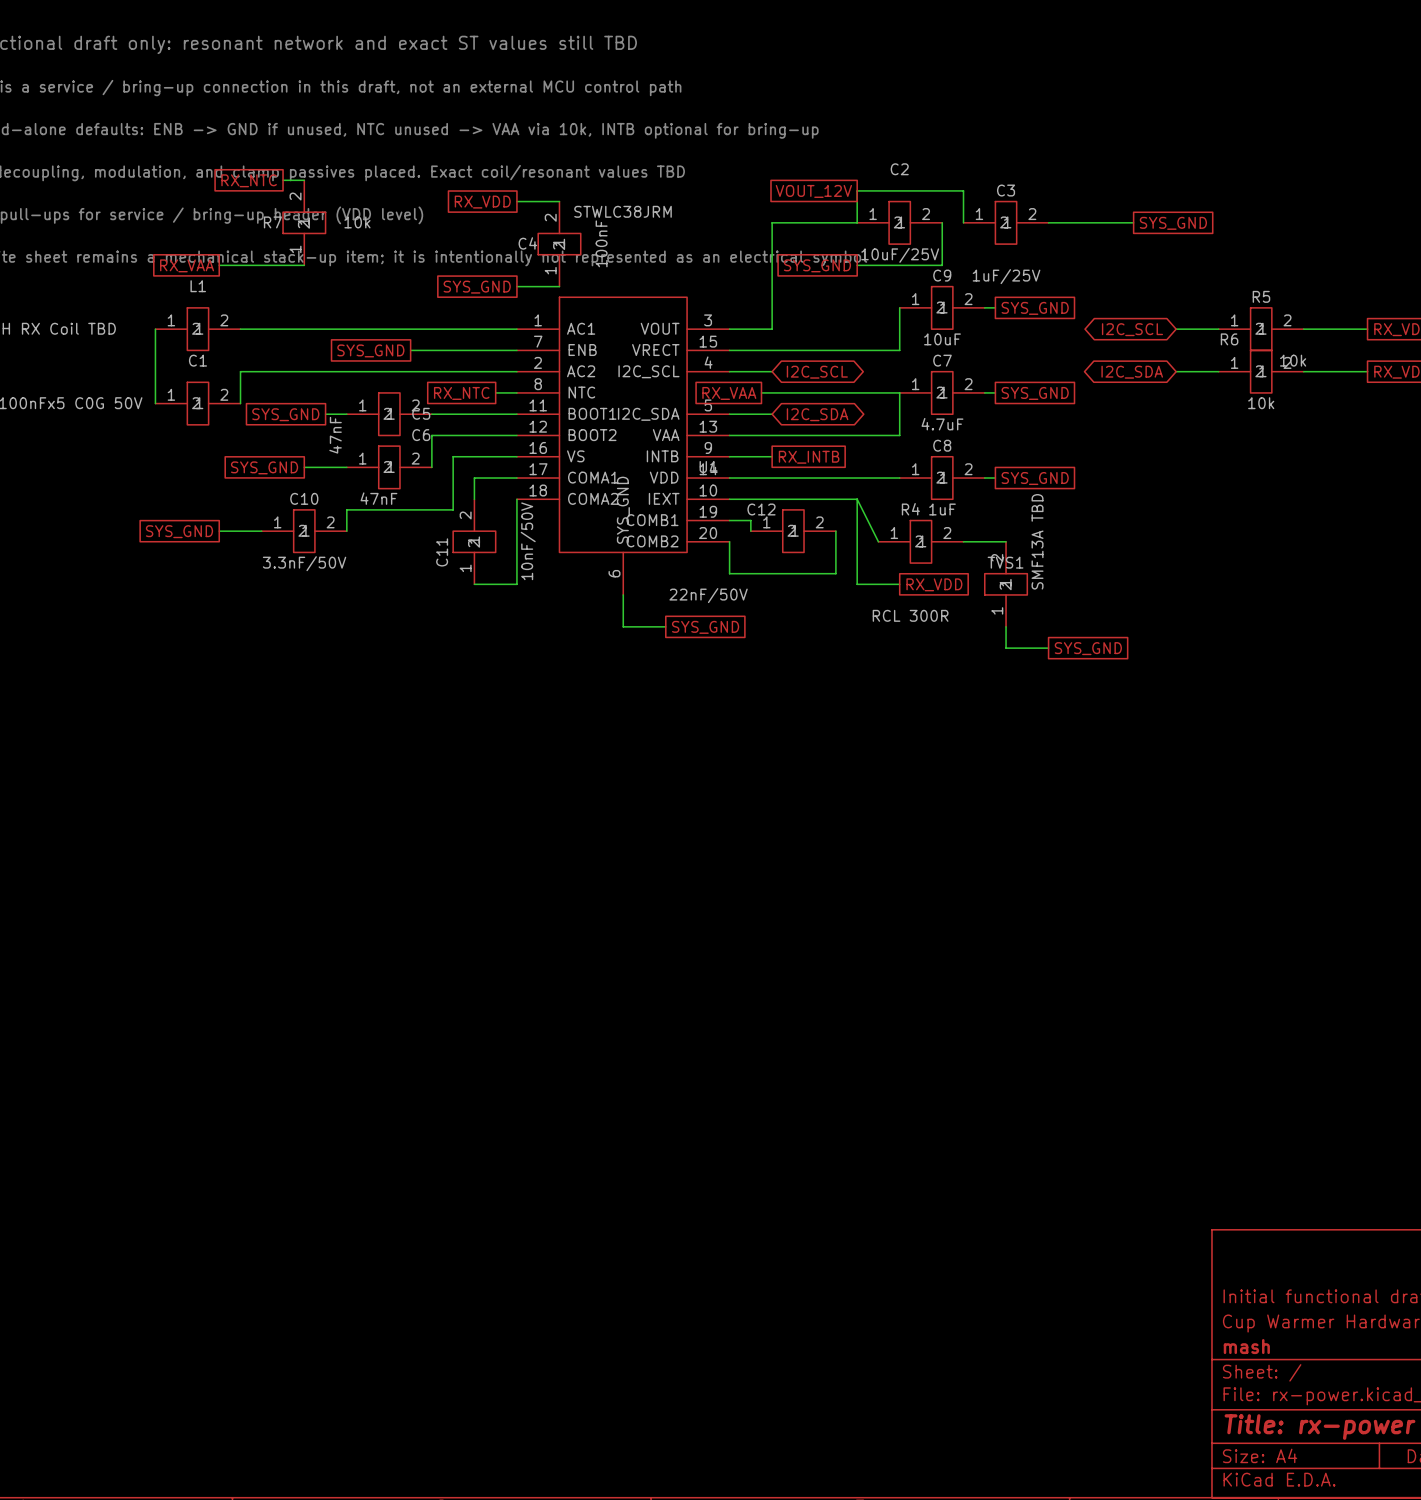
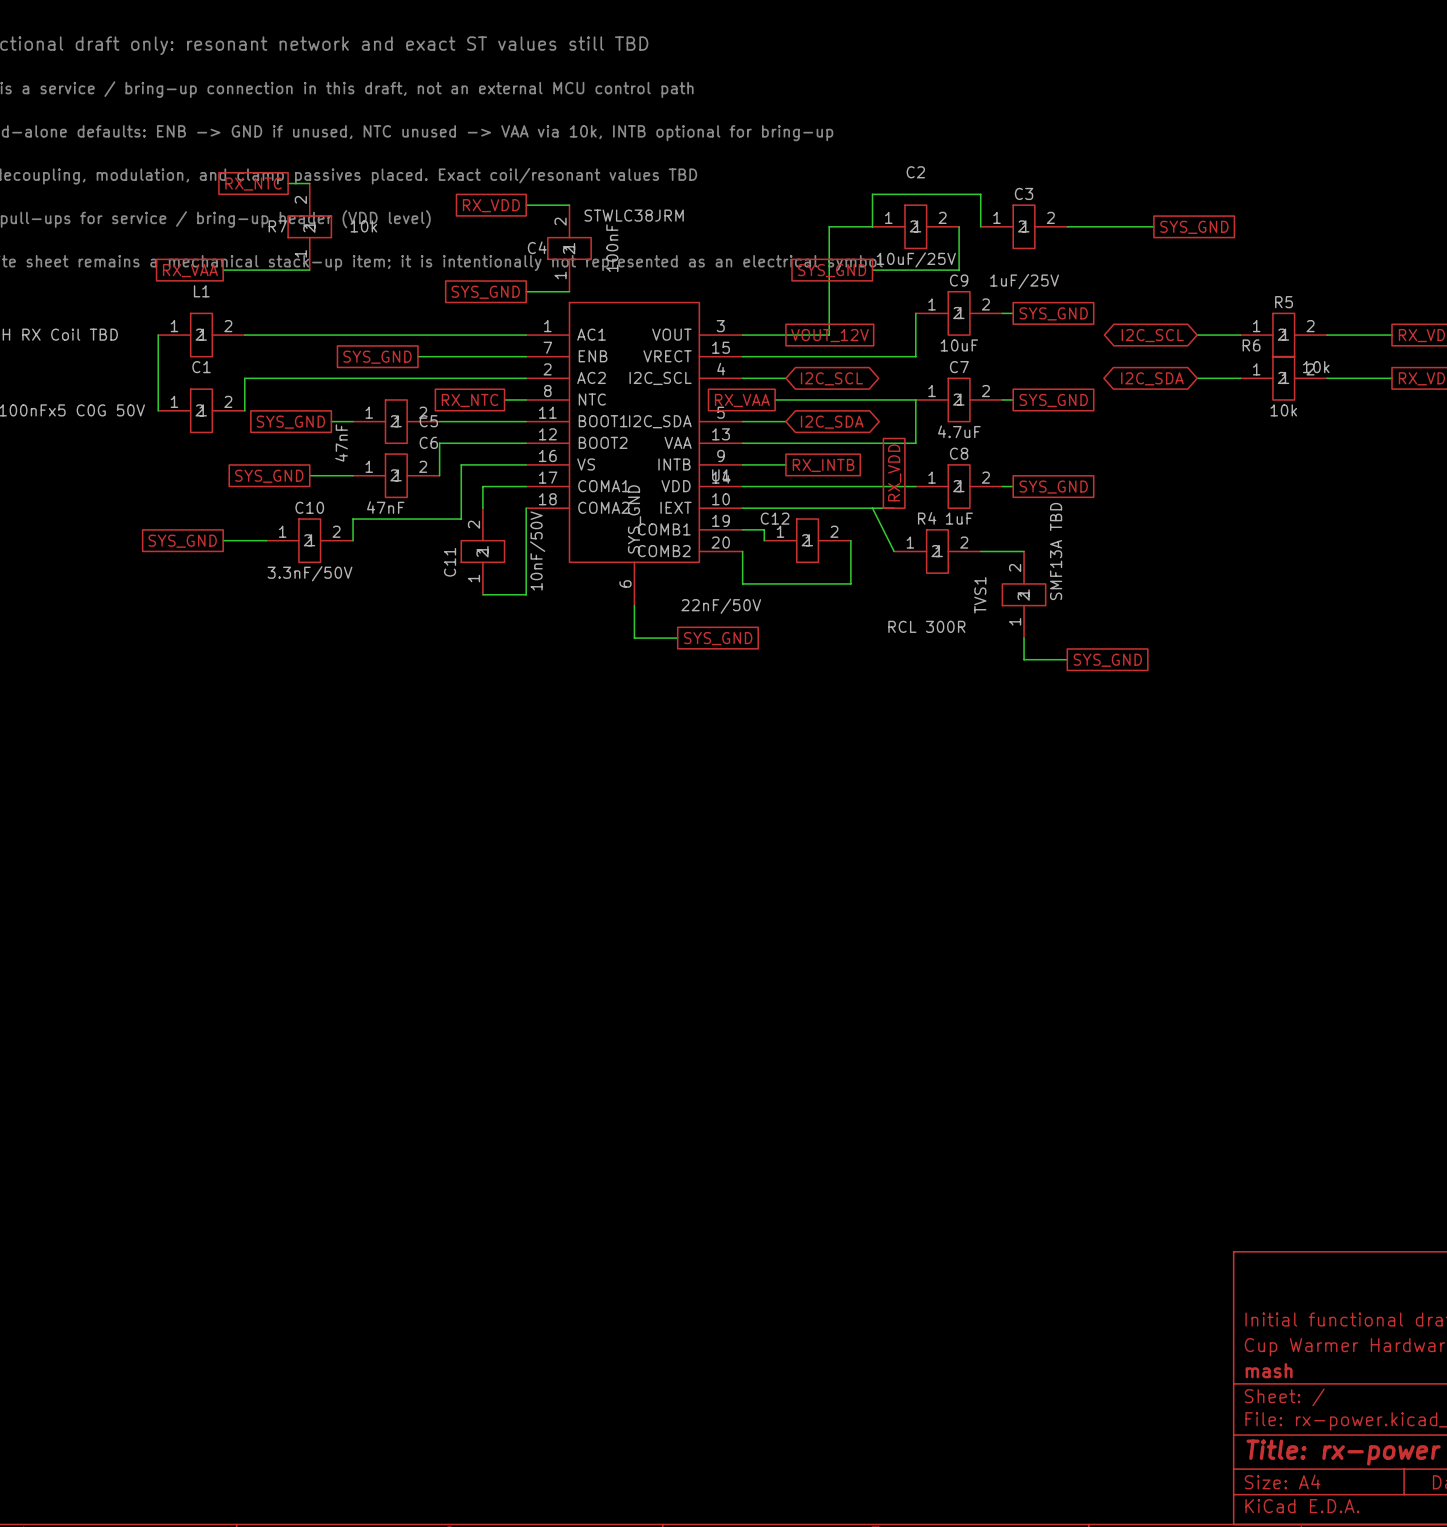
global label rotation: 0° (813, 191) -> 180° (830, 335)
global label position: VOUT_12V (813, 191) -> VOUT_12V (830, 335)
wire: (814, 222) (772, 222) (772, 329) -> (829, 226) (829, 335) (785, 335)
wire: (857, 499) (857, 584) (899, 584) -> (872, 508) (894, 508)
TVS1 name rotation: 0° (1005, 562) -> 90° counterclockwise (980, 595)
TVS1 name position: TVS1 (1005, 562) -> TVS1 (980, 595)
global label rotation: 0° (934, 584) -> 90° counterclockwise (894, 472)
global label position: RX_VDD (934, 584) -> RX_VDD (894, 472)

